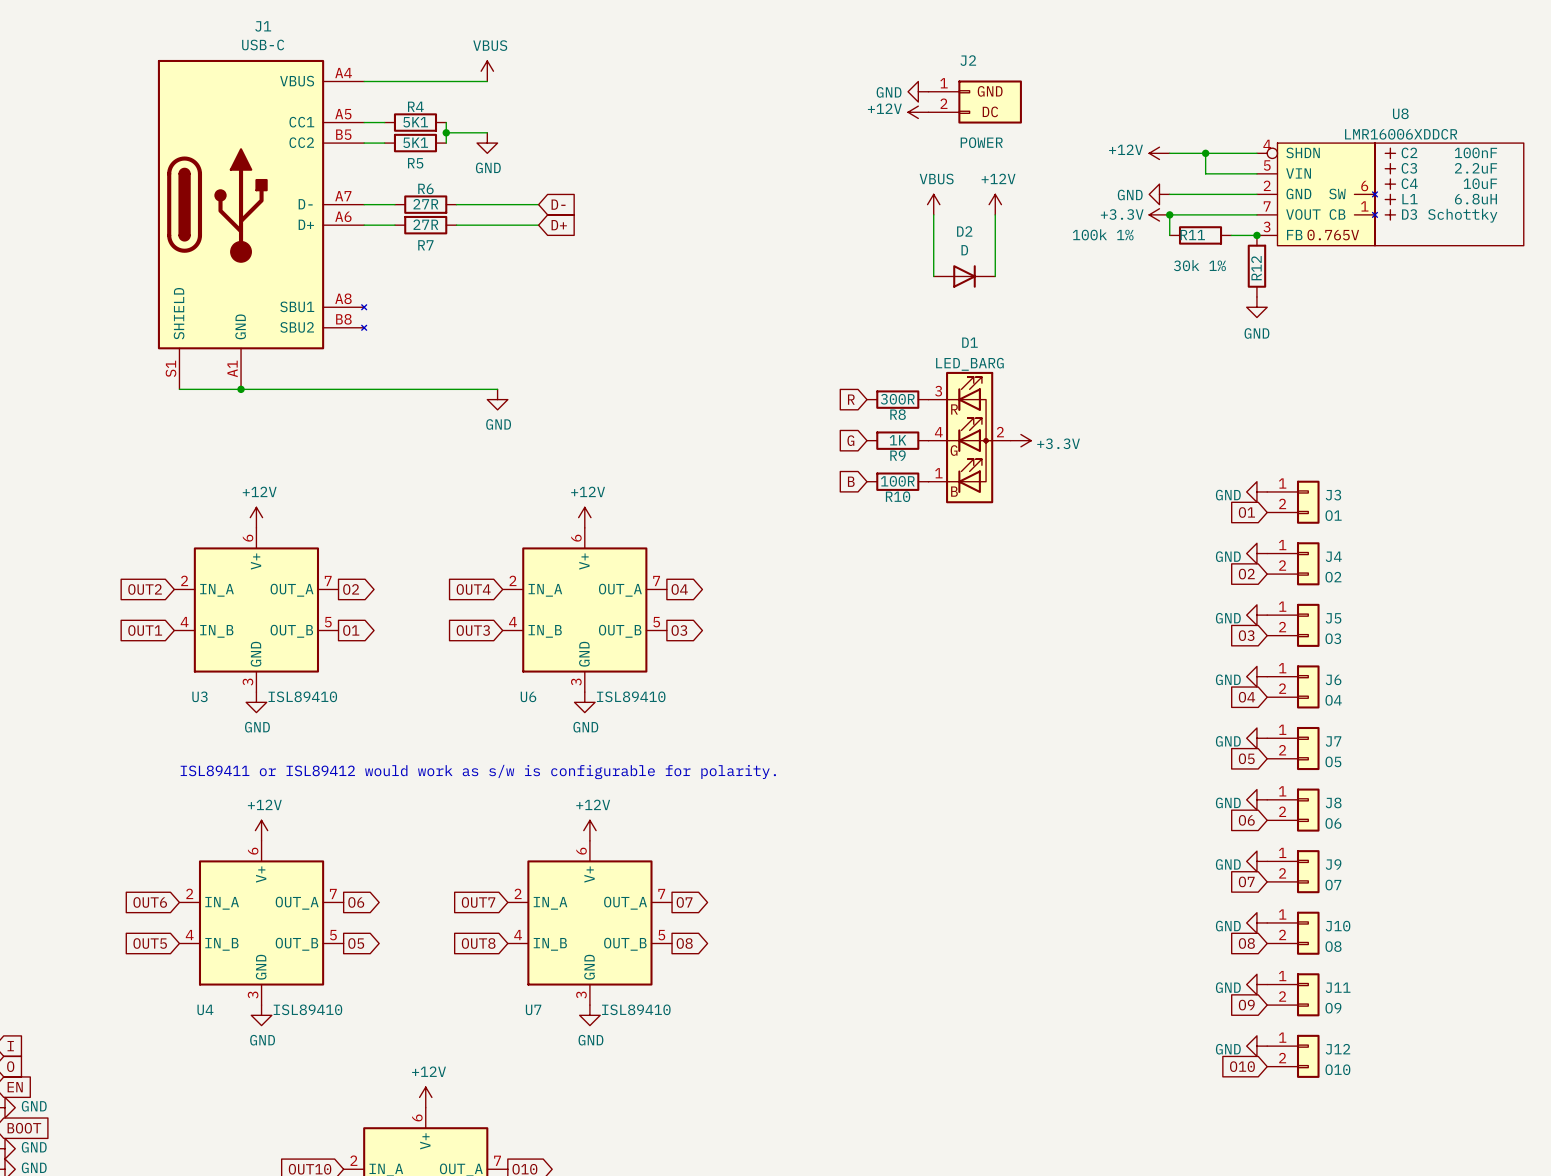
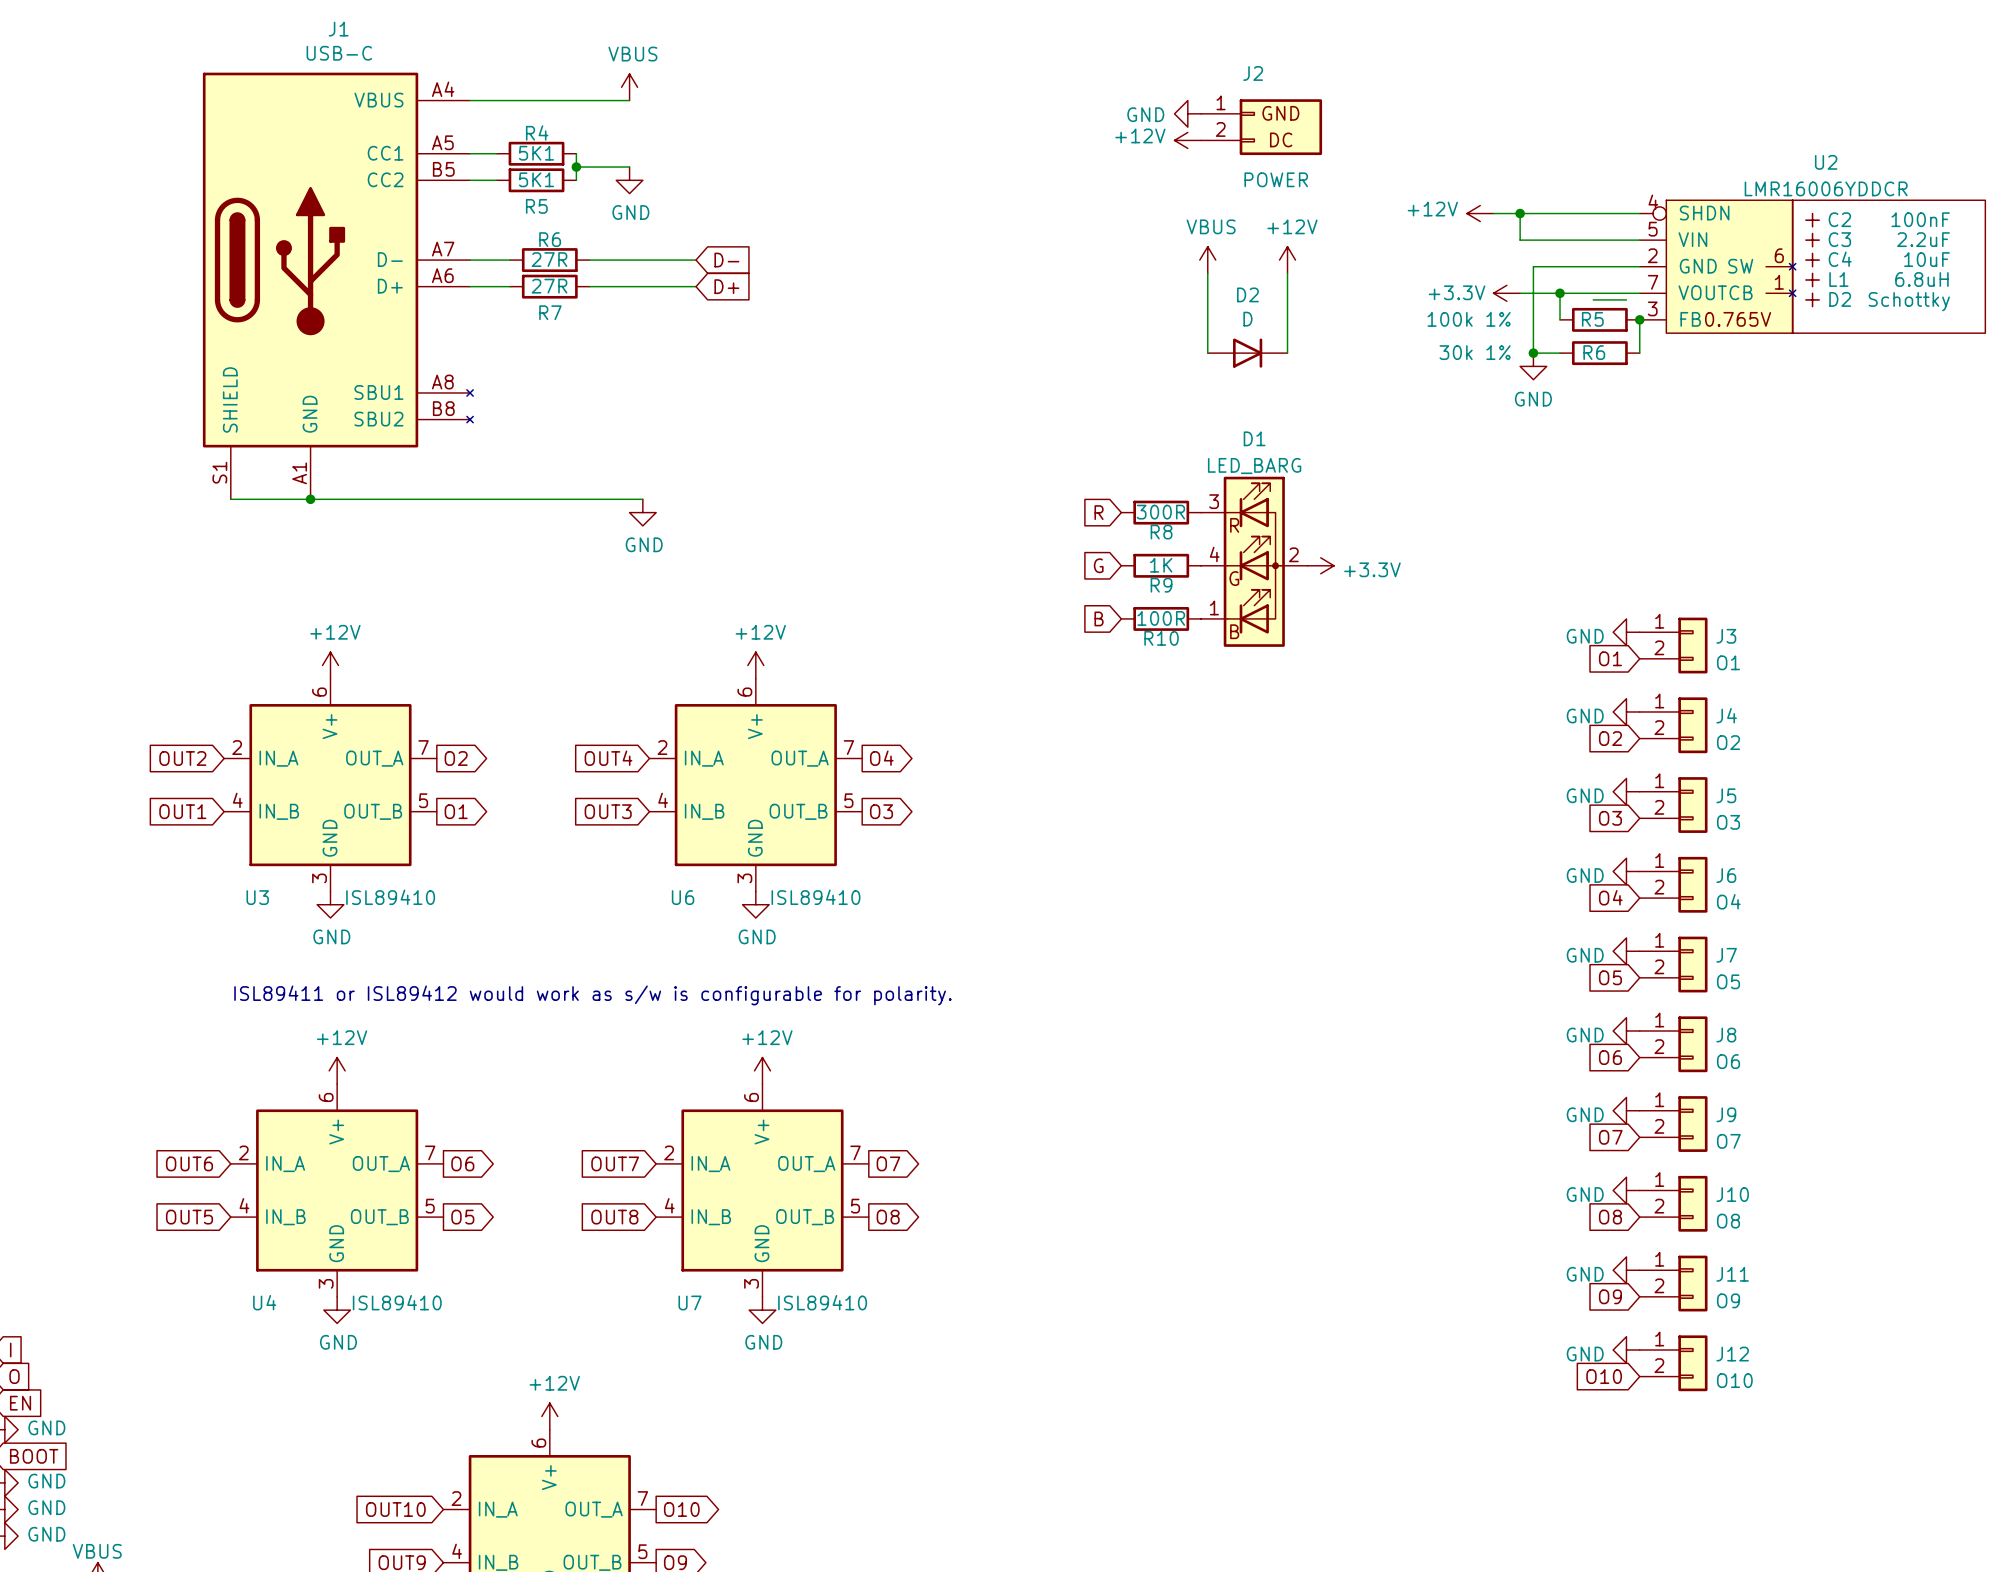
power symbol position: +12V (1159, 153) -> +12V (1480, 213)
wire: (1169, 153) (1256, 153) -> none
wire: (1205, 153) (1205, 173) (1256, 173) -> none
junction: (1205, 153) -> none
C2 position: (1390, 153) -> (1812, 220)
wire: none -> (1493, 213) (1639, 213)
wire: none -> (1520, 213) (1520, 240) (1639, 240)
junction: none -> (1520, 213)
C3 position: (1390, 168) -> (1812, 240)
C4 position: (1390, 184) -> (1812, 260)
power symbol: GND (1159, 194) -> none
wire: (1169, 194) (1256, 194) -> none
U8: LMR16006XDDCR (1390, 194) -> none
L1 position: (1390, 199) -> (1812, 280)
wire: none -> (1639, 266) (1533, 266) (1533, 353) (1560, 353)
U2: none -> LMR16006YDDCR (1812, 266)
power symbol position: +3.3V (1159, 214) -> +3.3V (1506, 293)
junction: (1169, 214) -> none
wire: (1256, 214) (1169, 214) (1169, 235) -> none
D3: Schottky (1390, 214) -> none
wire: none -> (1520, 293) (1639, 293)
wire: none -> (1560, 293) (1560, 319)
junction: none -> (1560, 293)
R11: 100k 1% (1200, 235) -> none
junction position: (1256, 235) -> (1639, 319)
D2: none -> Schottky (1812, 299)
R5: none -> 100k 1% (1599, 319)
wire: none -> (1639, 319) (1639, 353)
R12: 30k 1% (1256, 266) -> none
junction: none -> (1533, 353)
R6: none -> 30k 1% (1599, 353)
power symbol: none -> GND (1533, 366)
power symbol: GND (1256, 307) -> none

